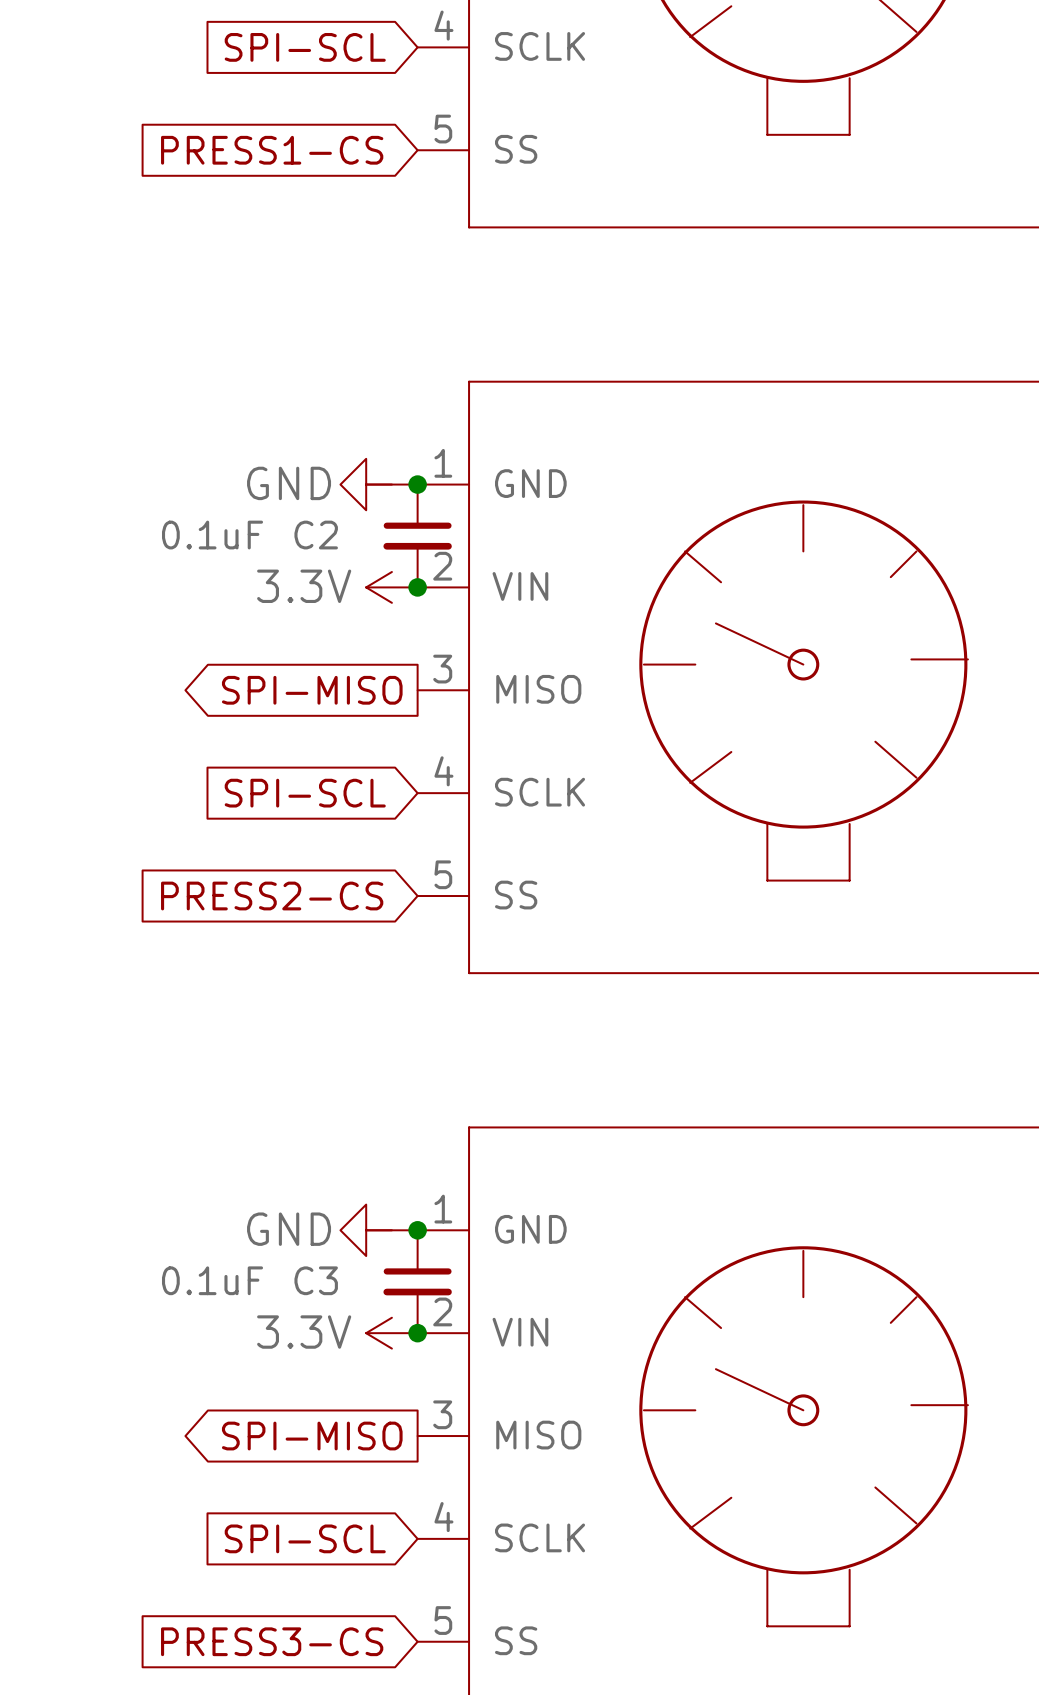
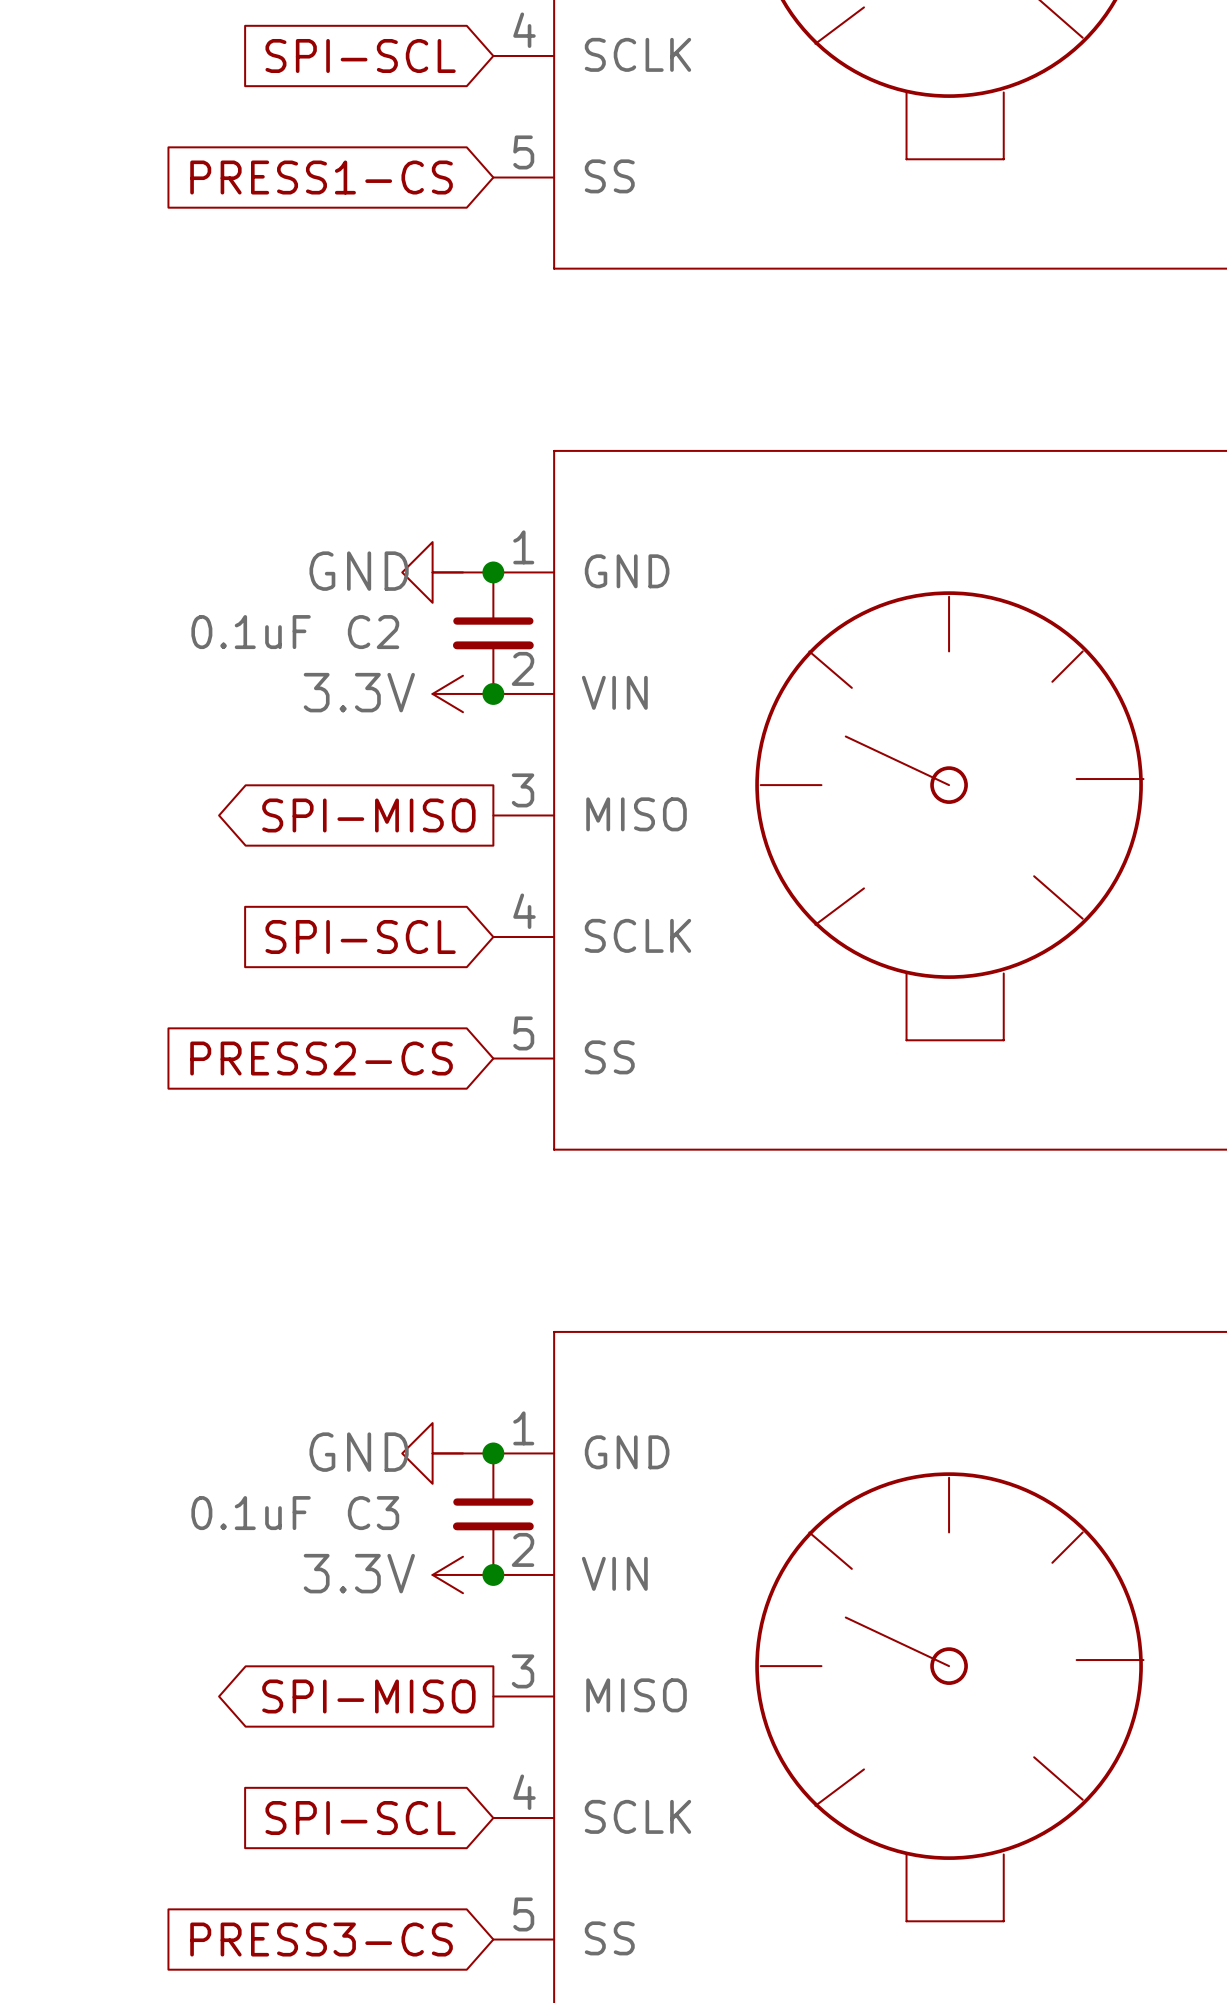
power symbol text position: GND (289, 483) -> GND (359, 571)
power symbol text position: GND (289, 1229) -> GND (359, 1452)

